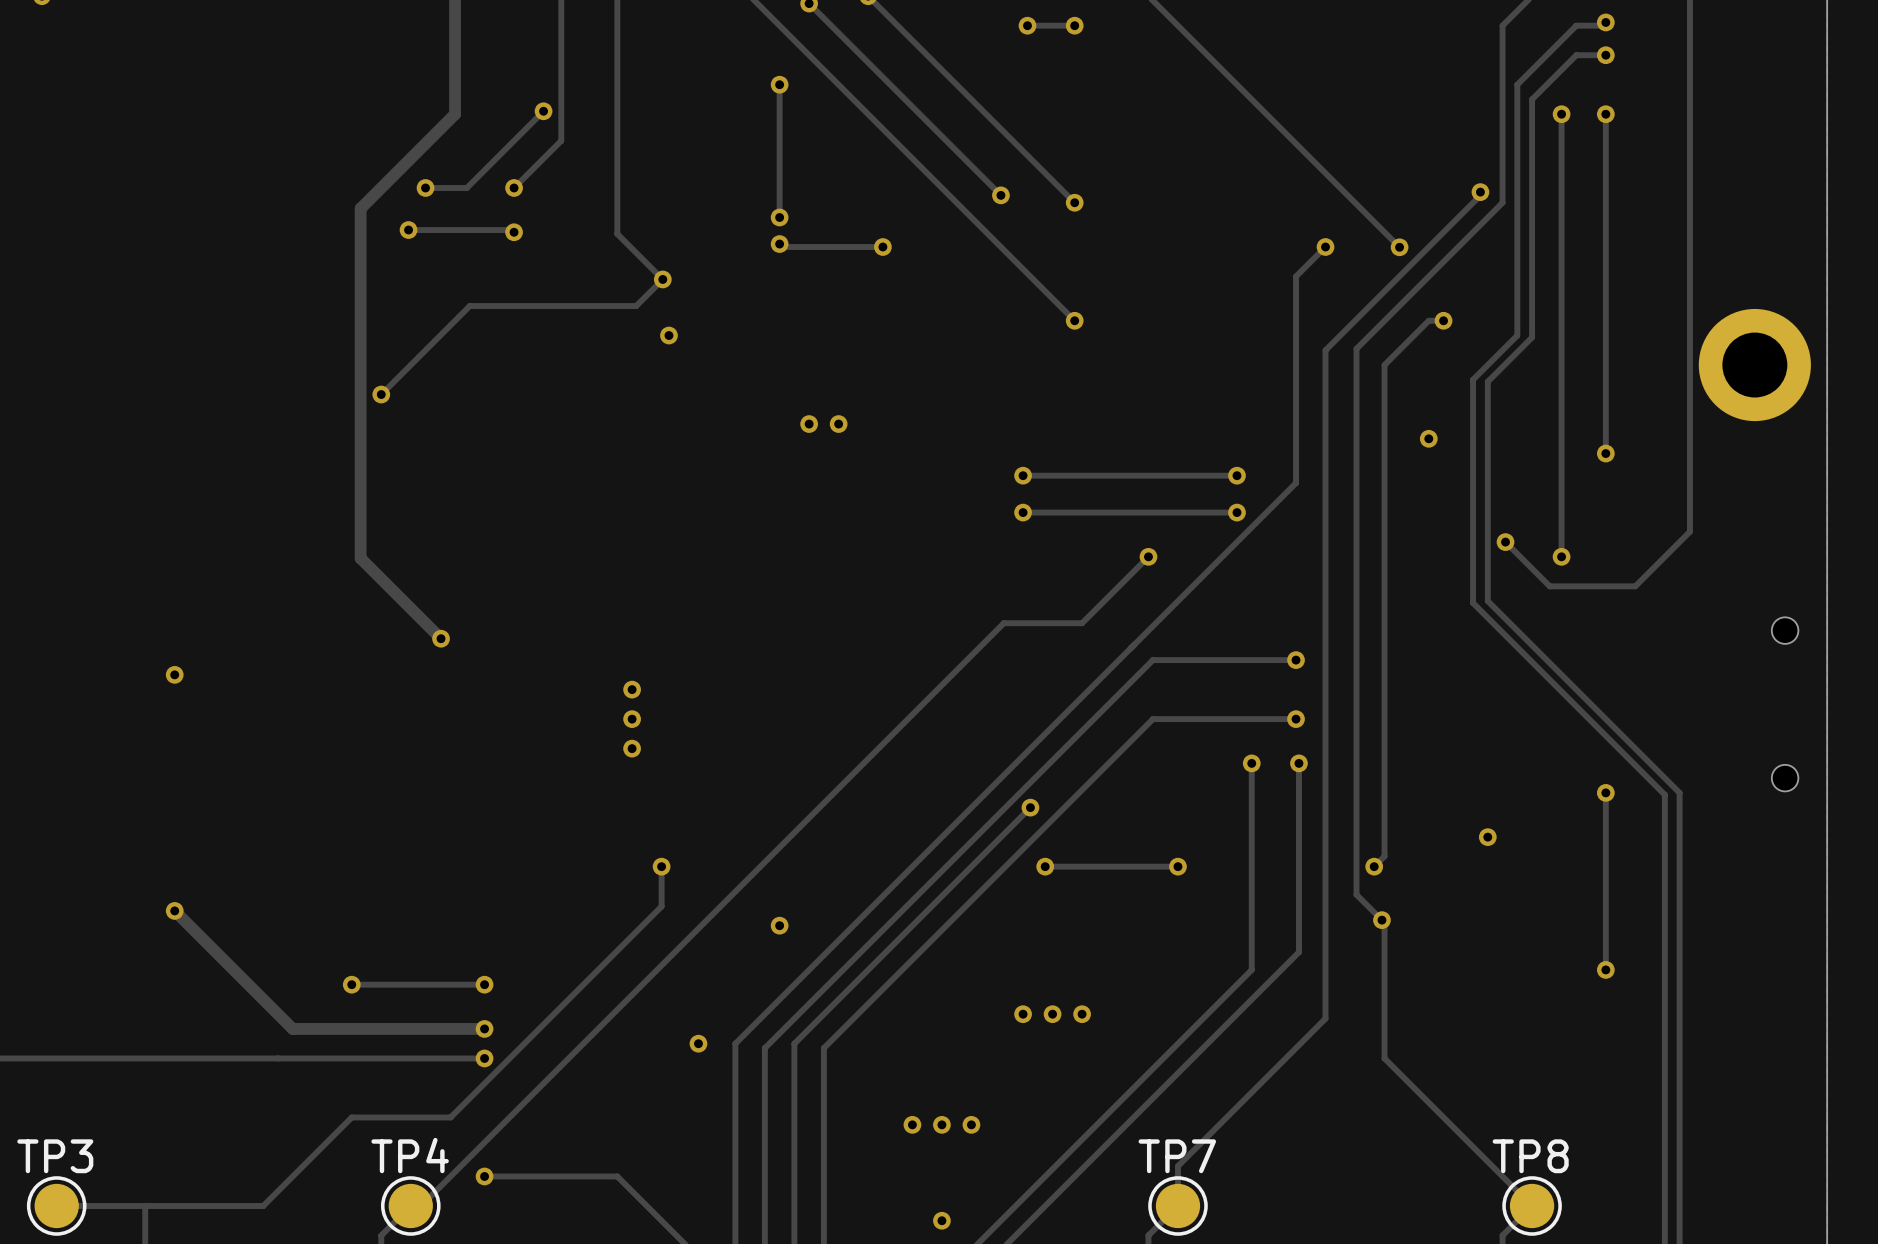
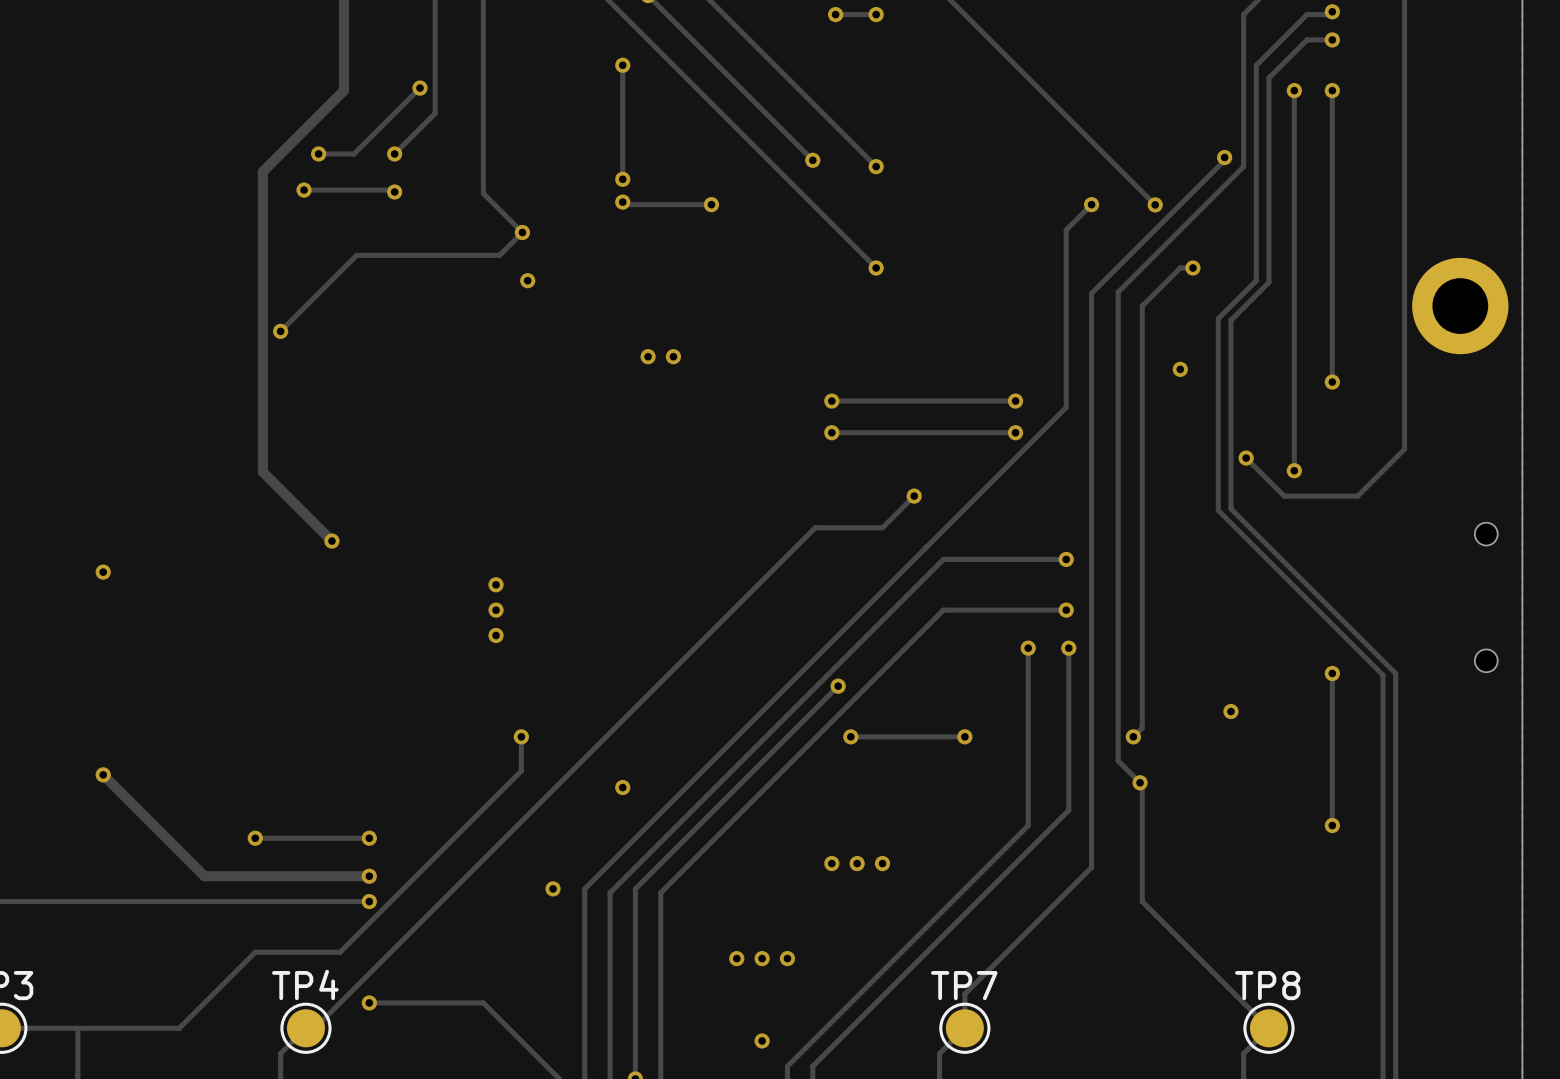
track: (1148, 556) (1118, 586) -> none
via position: (1148, 556) -> (914, 496)

